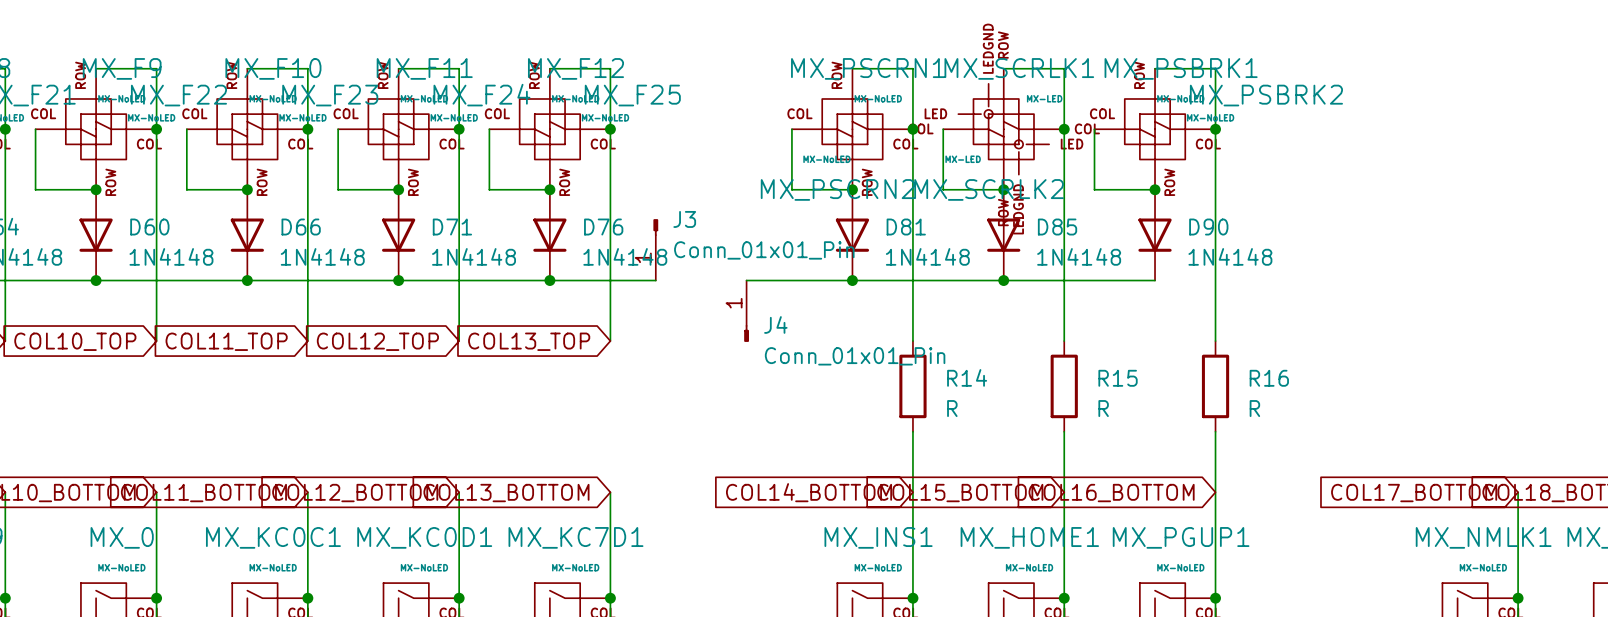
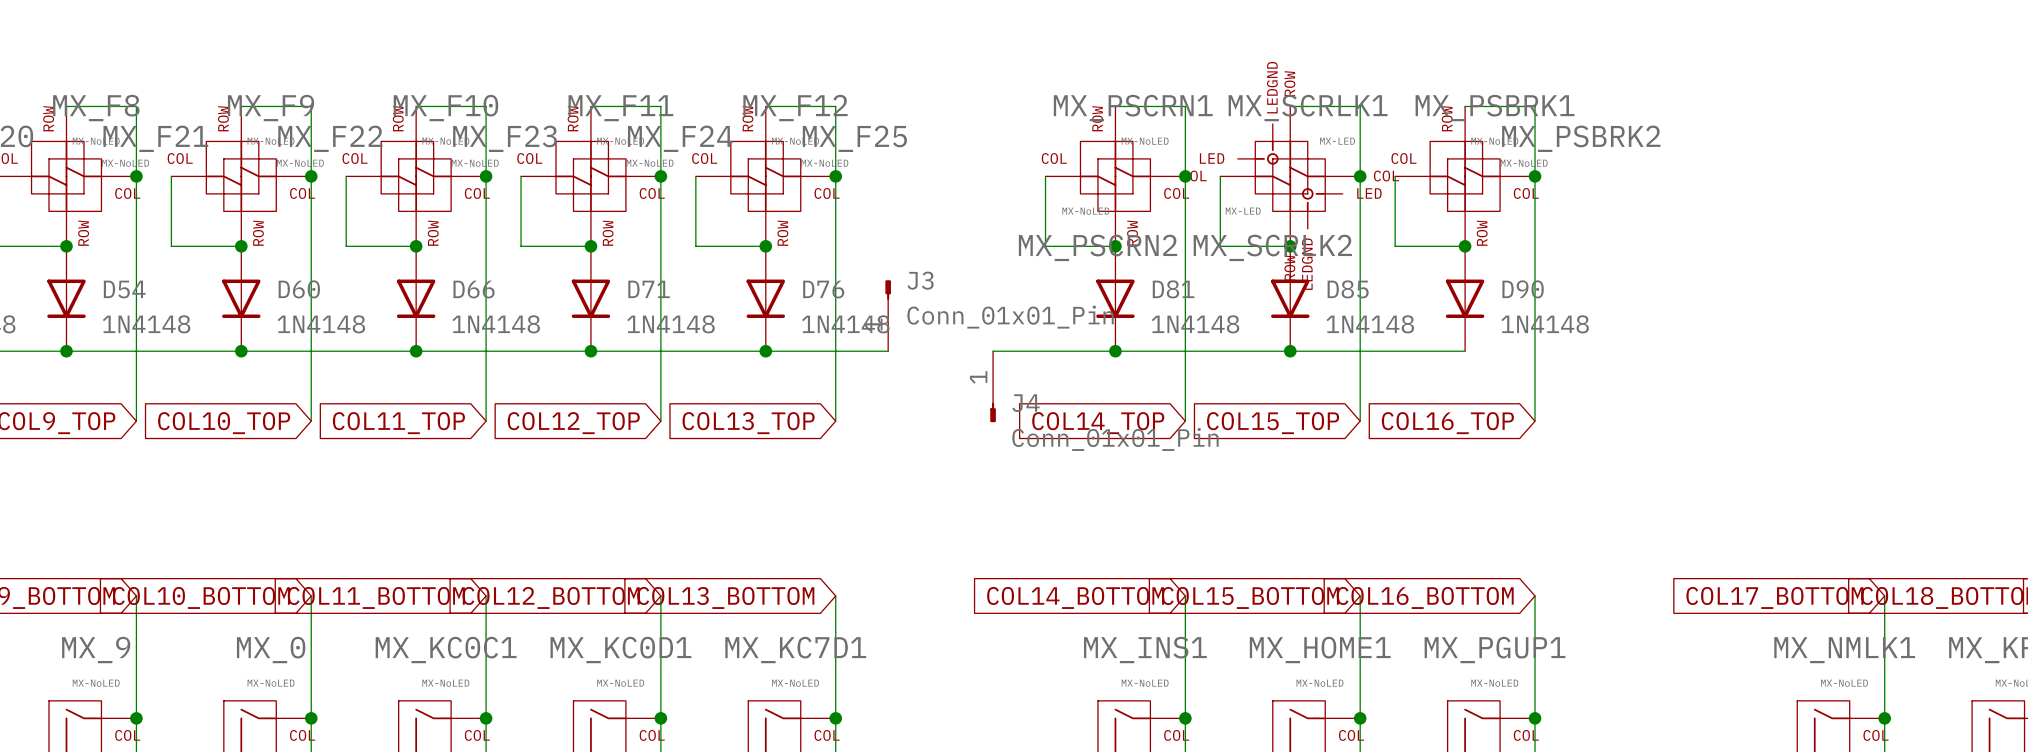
global label: none -> COL14_TOP (1098, 423)
global label: none -> COL15_TOP (1273, 423)
global label: none -> COL16_TOP (1447, 423)
R14: R (912, 386) -> none
R15: R (1064, 386) -> none
R16: R (1215, 386) -> none
wire: (912, 431) (912, 492) -> none
wire: (1064, 431) (1064, 492) -> none
wire: (1215, 431) (1215, 492) -> none

